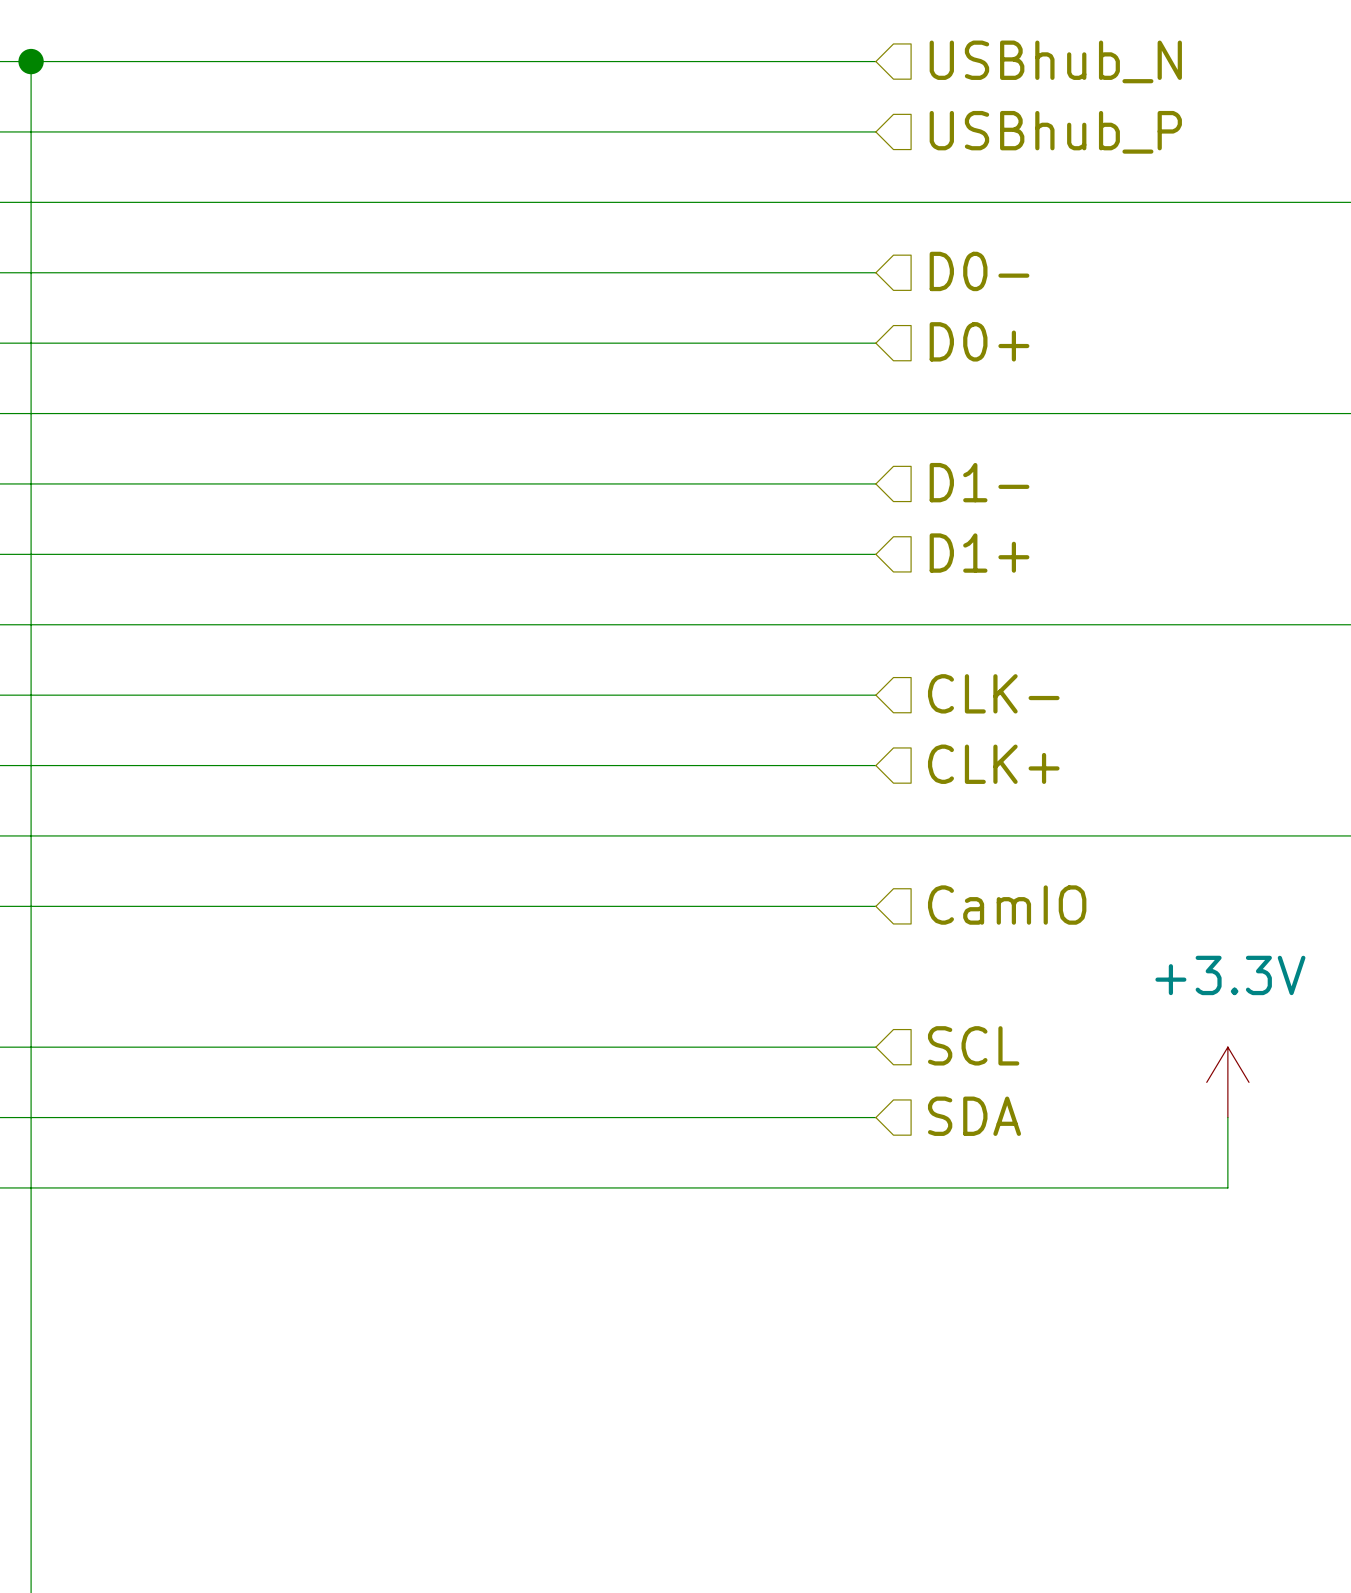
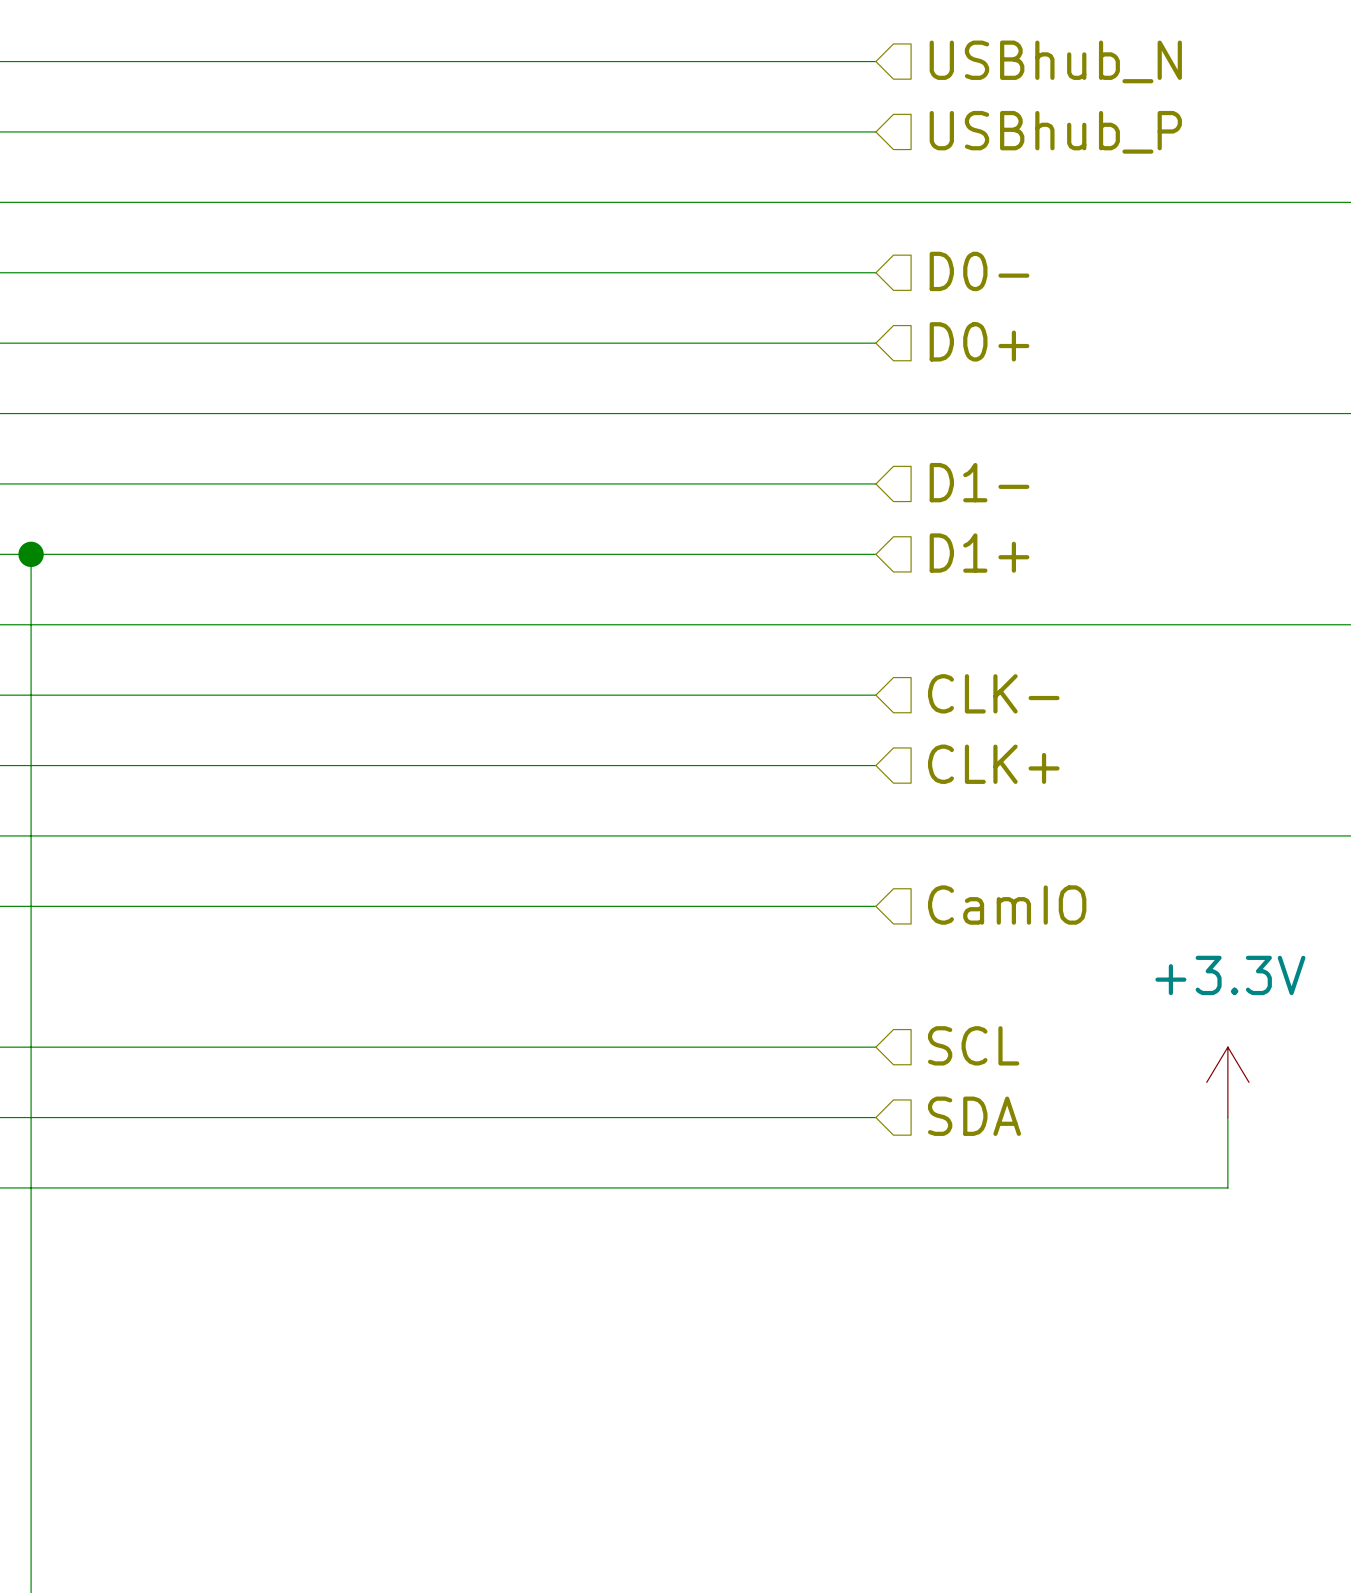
wire: (31, 61) (31, 554) -> none
junction: (31, 61) -> none
junction: none -> (31, 554)

